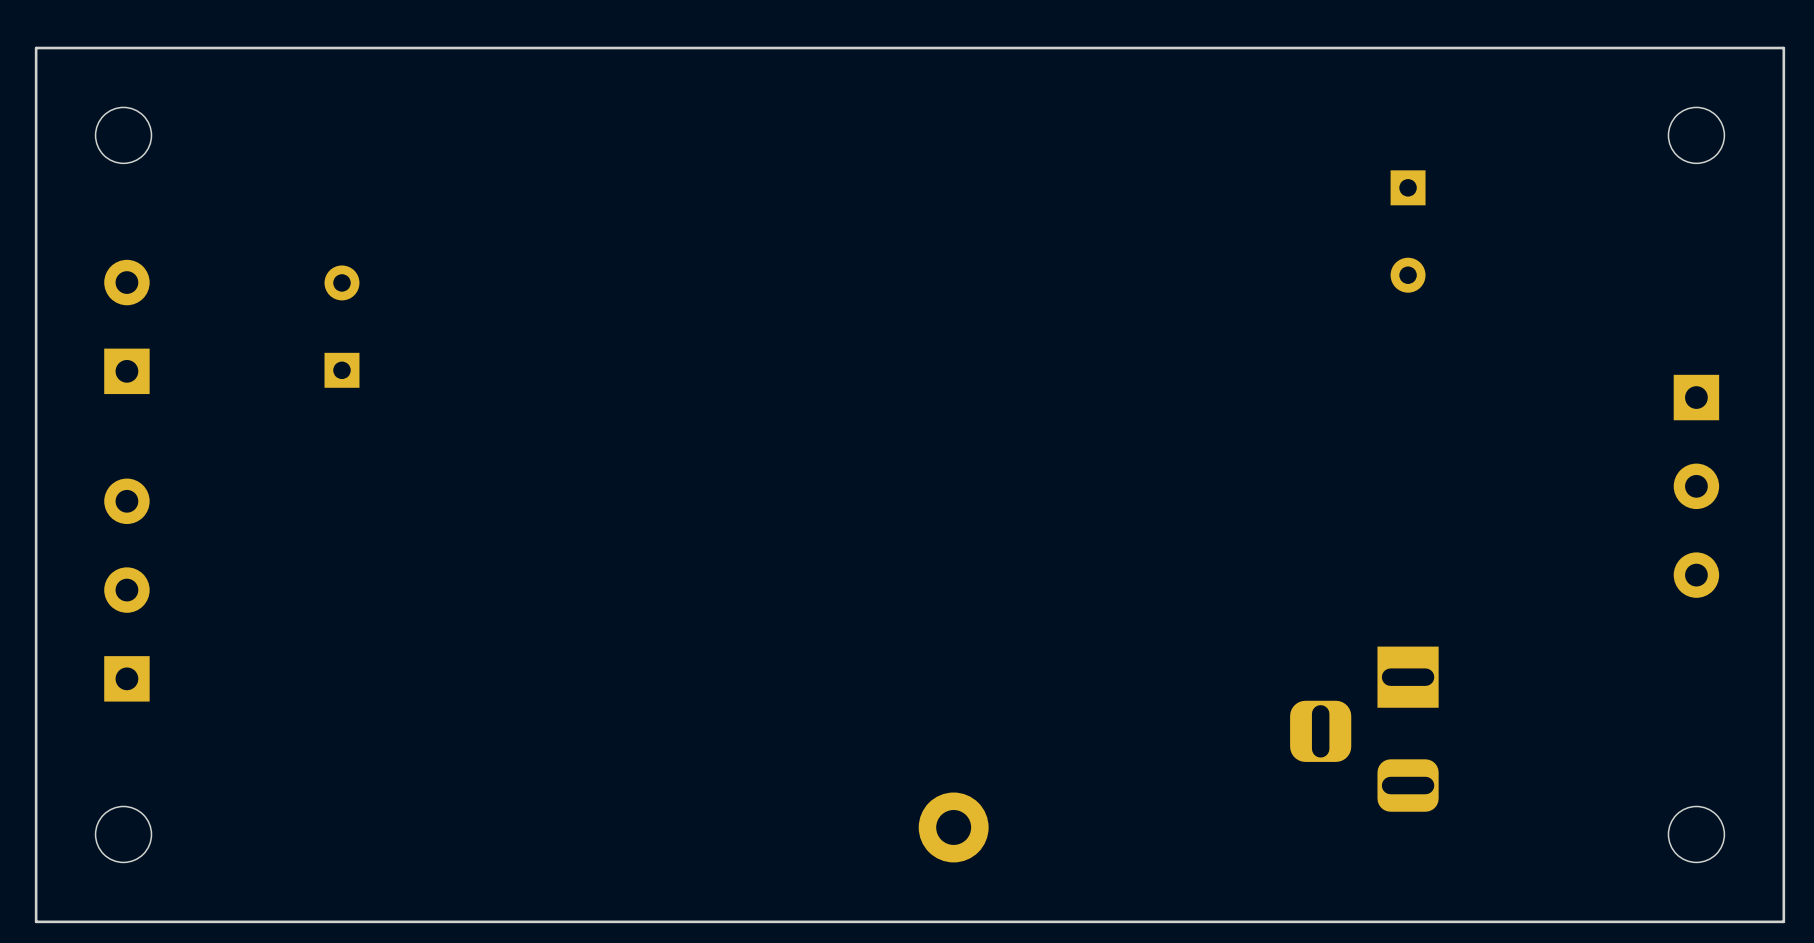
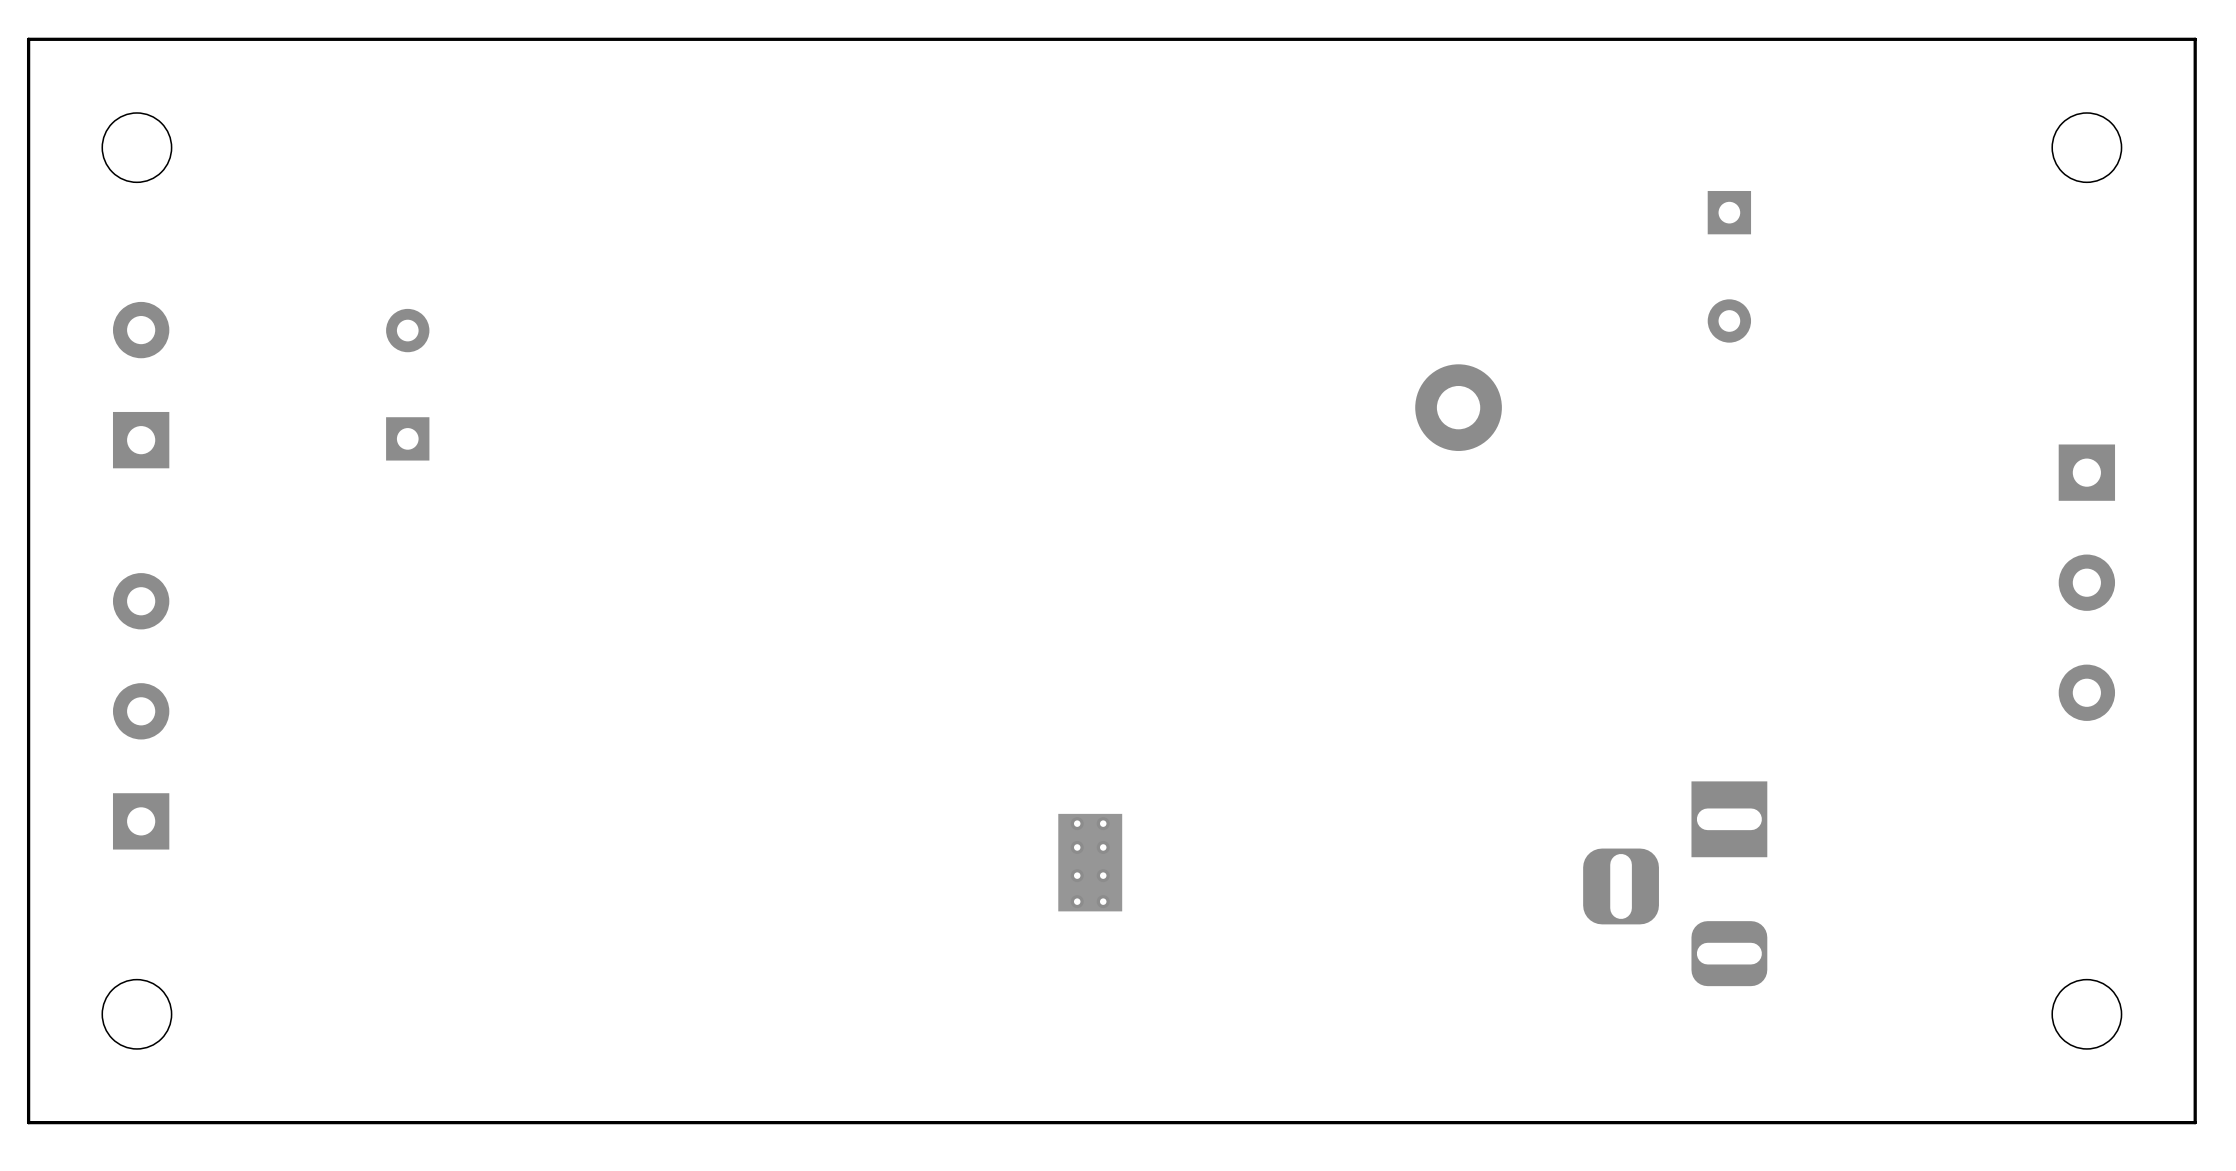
part: none -> (1458, 407)
part: none -> (1090, 862)
part: (953, 827) -> none

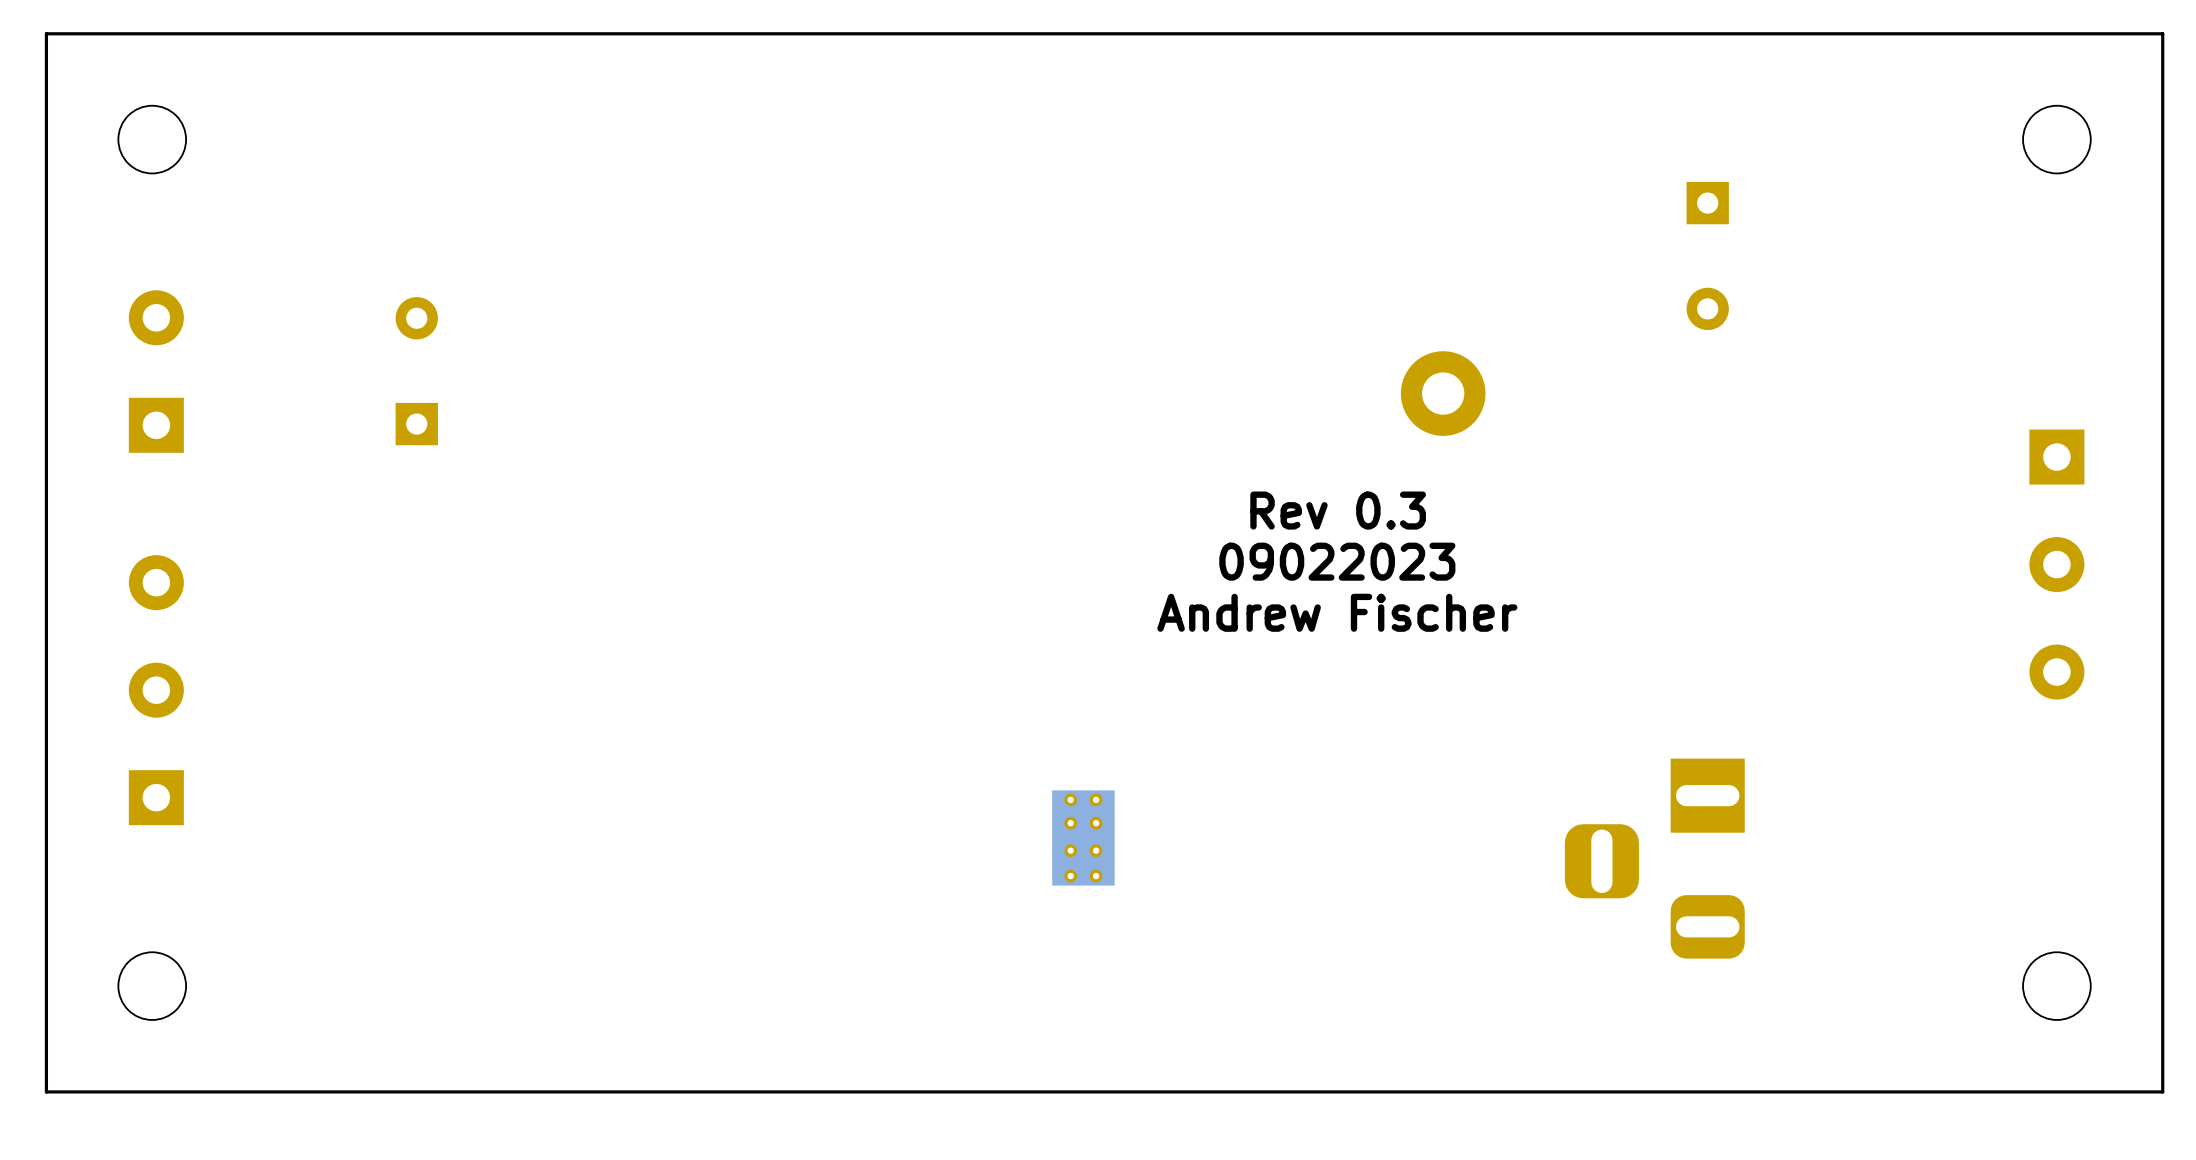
text: none -> Rev 0.3 (1338, 510)
text: none -> 09022023 (1337, 561)
text: none -> Andrew Fischer (1337, 612)

